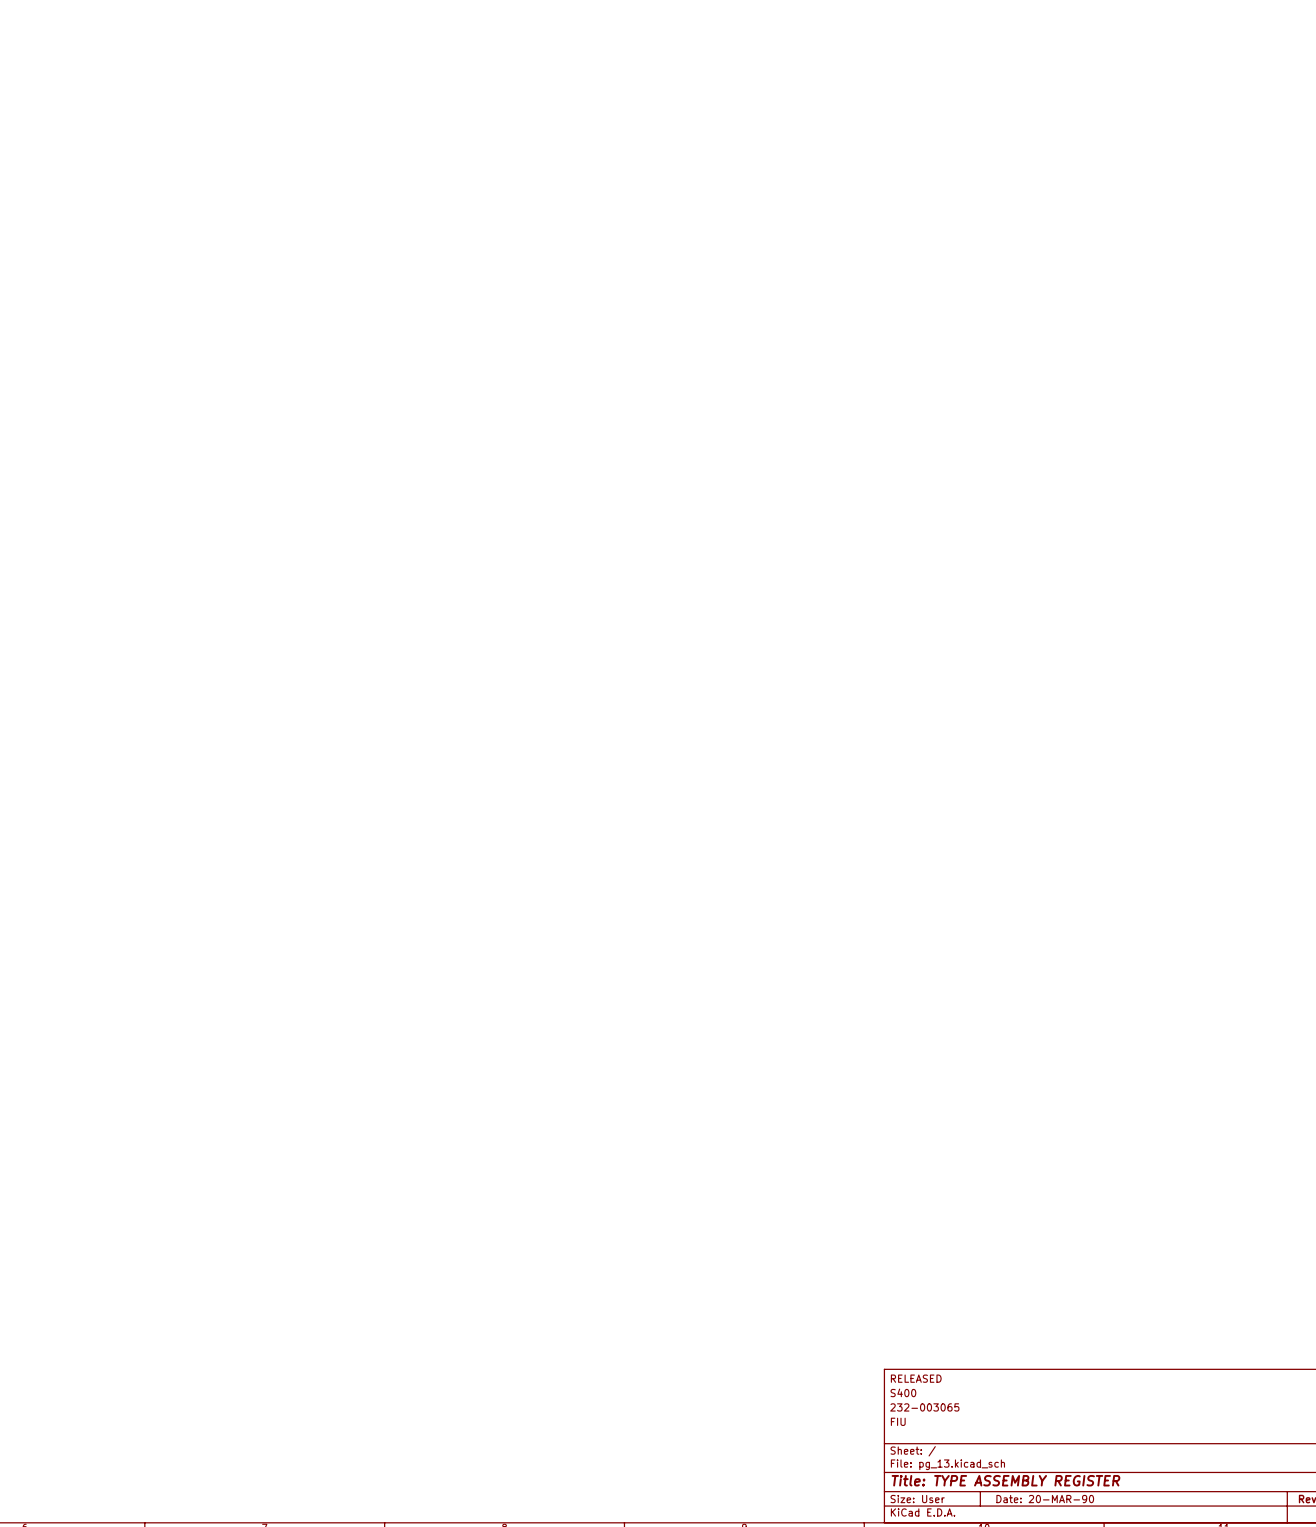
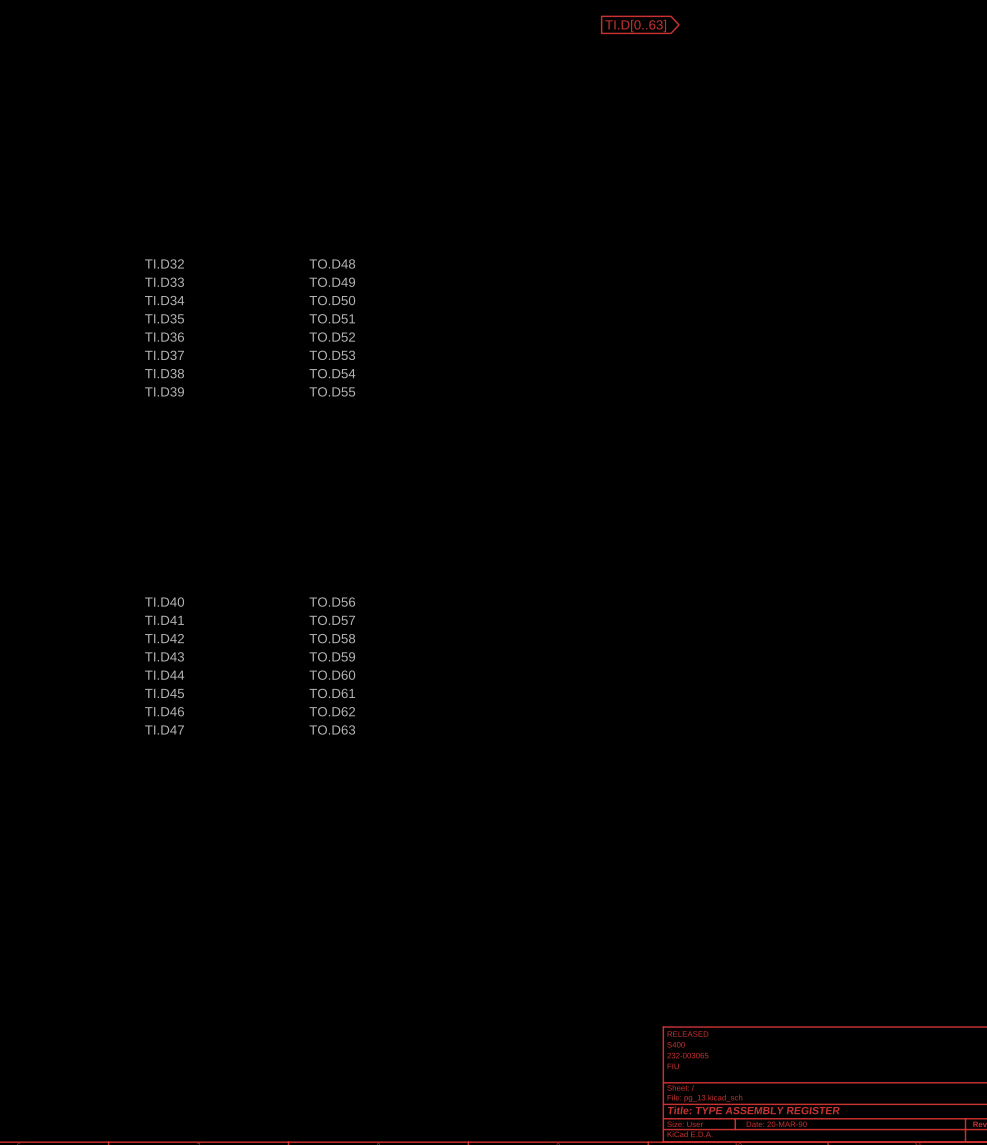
global label: none -> TI.D[0..63] (635, 26)
label: none -> TI.D32 (164, 263)
label: none -> TO.D48 (332, 263)
label: none -> TI.D33 (164, 282)
label: none -> TO.D49 (332, 282)
label: none -> TI.D34 (164, 300)
label: none -> TO.D50 (332, 300)
label: none -> TI.D35 (164, 318)
label: none -> TO.D51 (332, 318)
label: none -> TI.D36 (164, 337)
label: none -> TO.D52 (332, 337)
label: none -> TI.D37 (164, 355)
label: none -> TO.D53 (332, 355)
label: none -> TO.D54 (332, 373)
label: none -> TI.D38 (164, 373)
label: none -> TI.D39 (164, 391)
label: none -> TO.D55 (332, 391)
label: none -> TI.D40 (164, 602)
label: none -> TO.D56 (332, 602)
label: none -> TI.D41 (164, 620)
label: none -> TO.D57 (332, 620)
label: none -> TI.D42 (164, 638)
label: none -> TO.D58 (332, 638)
label: none -> TI.D43 (164, 656)
label: none -> TO.D59 (332, 656)
label: none -> TI.D44 (164, 675)
label: none -> TO.D60 (332, 675)
label: none -> TI.D45 (164, 693)
label: none -> TO.D61 (332, 693)
label: none -> TI.D46 (164, 711)
label: none -> TO.D62 (332, 711)
label: none -> TI.D47 (164, 729)
label: none -> TO.D63 (332, 729)

